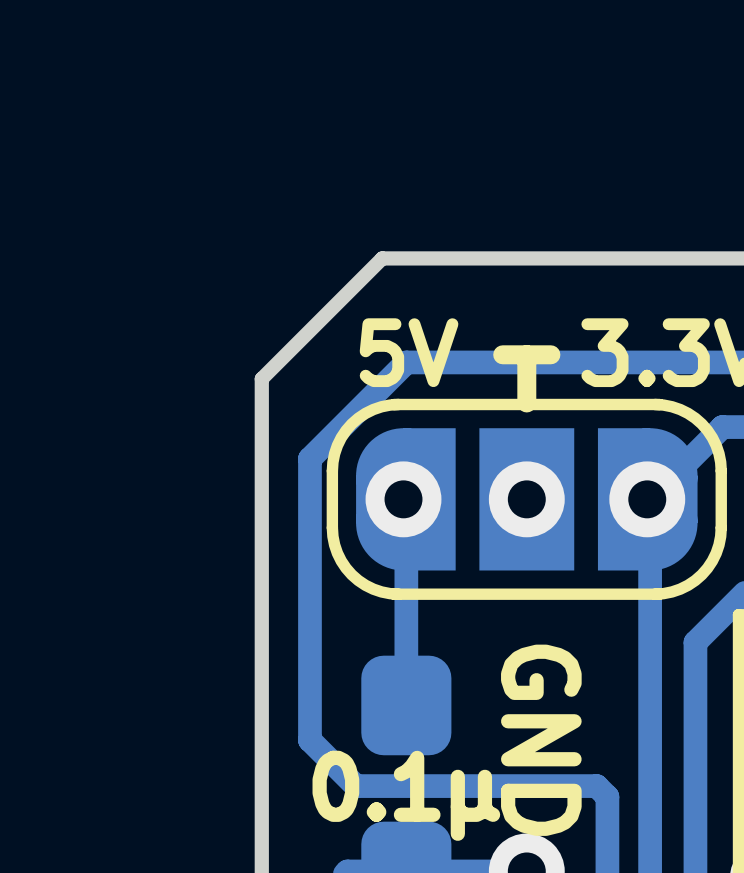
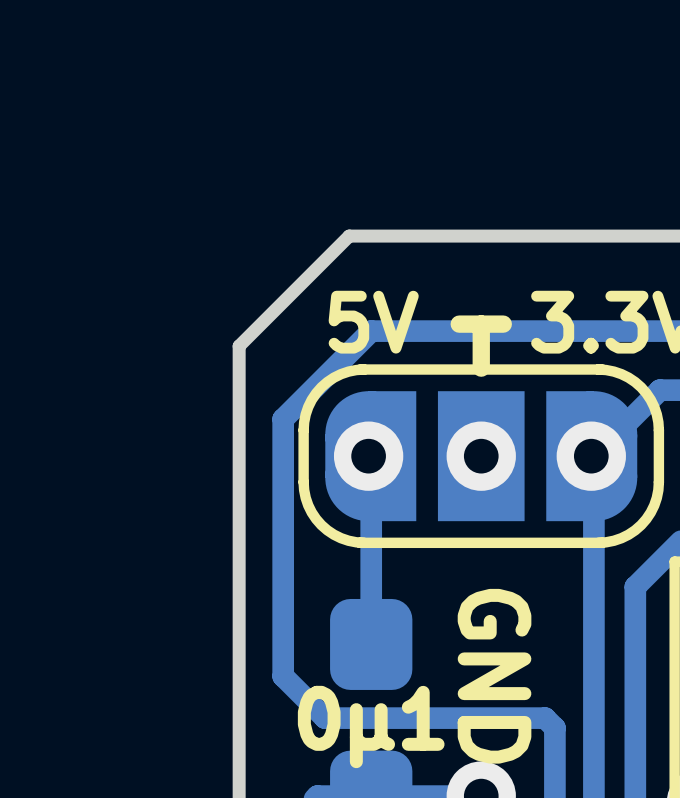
part value: 0.1μ (406, 795) -> 0μ1 (371, 727)

